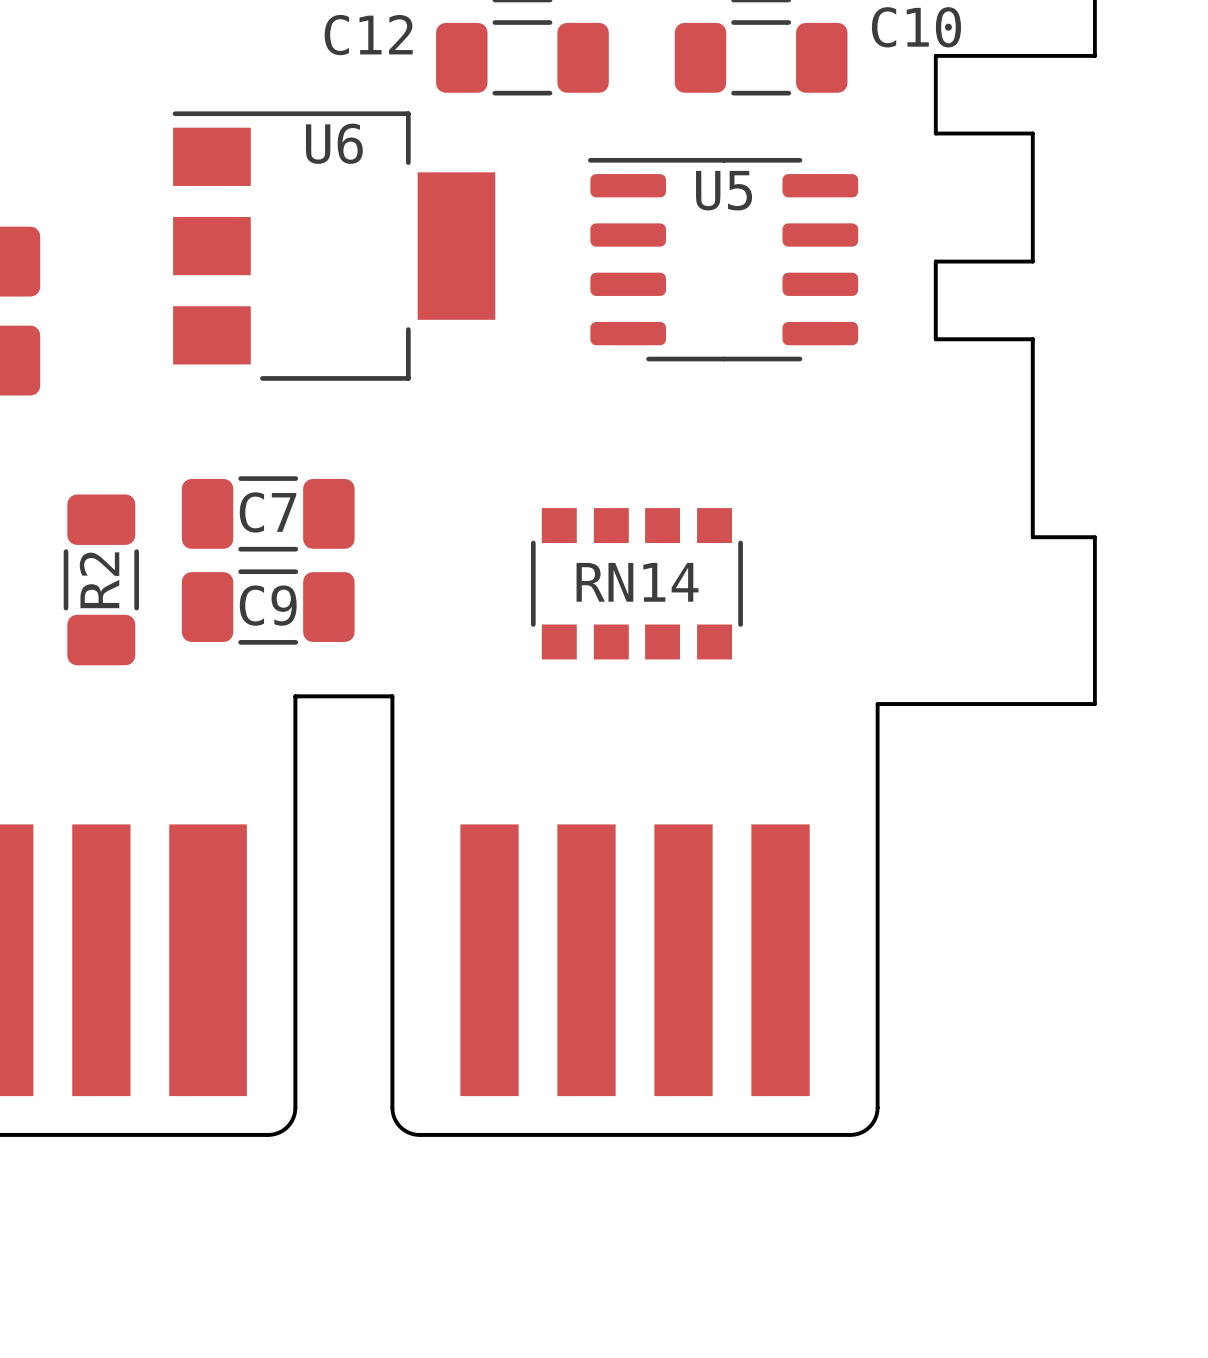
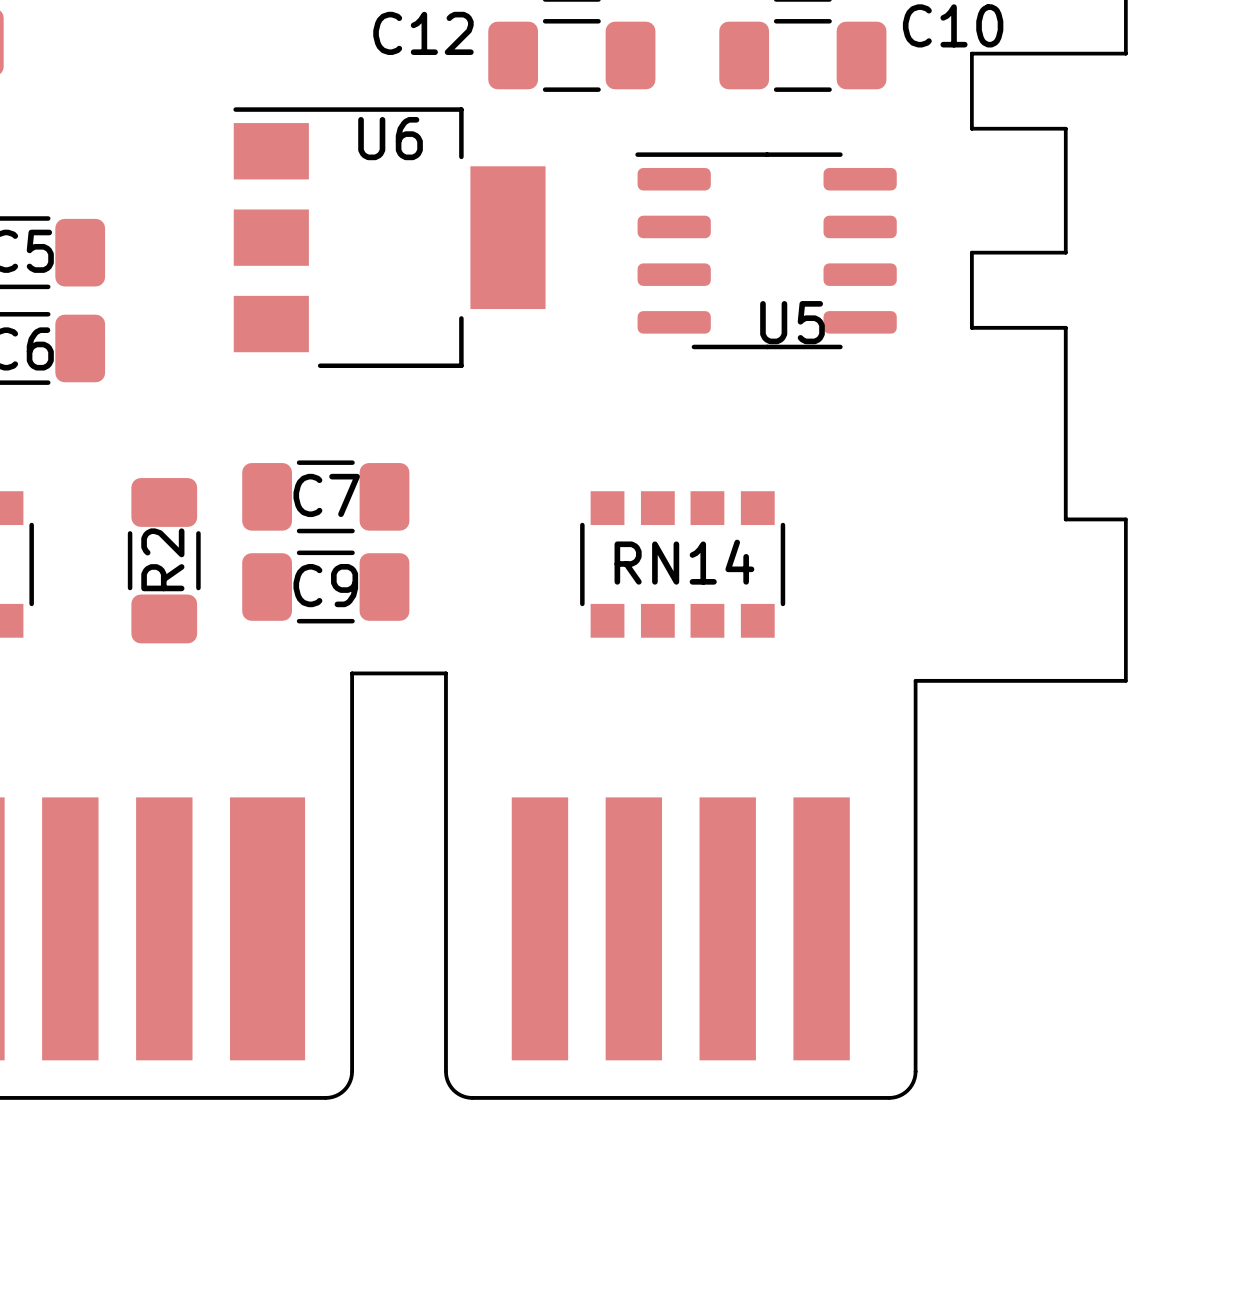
U5 name position: U5 (724, 190) -> U5 (792, 322)

